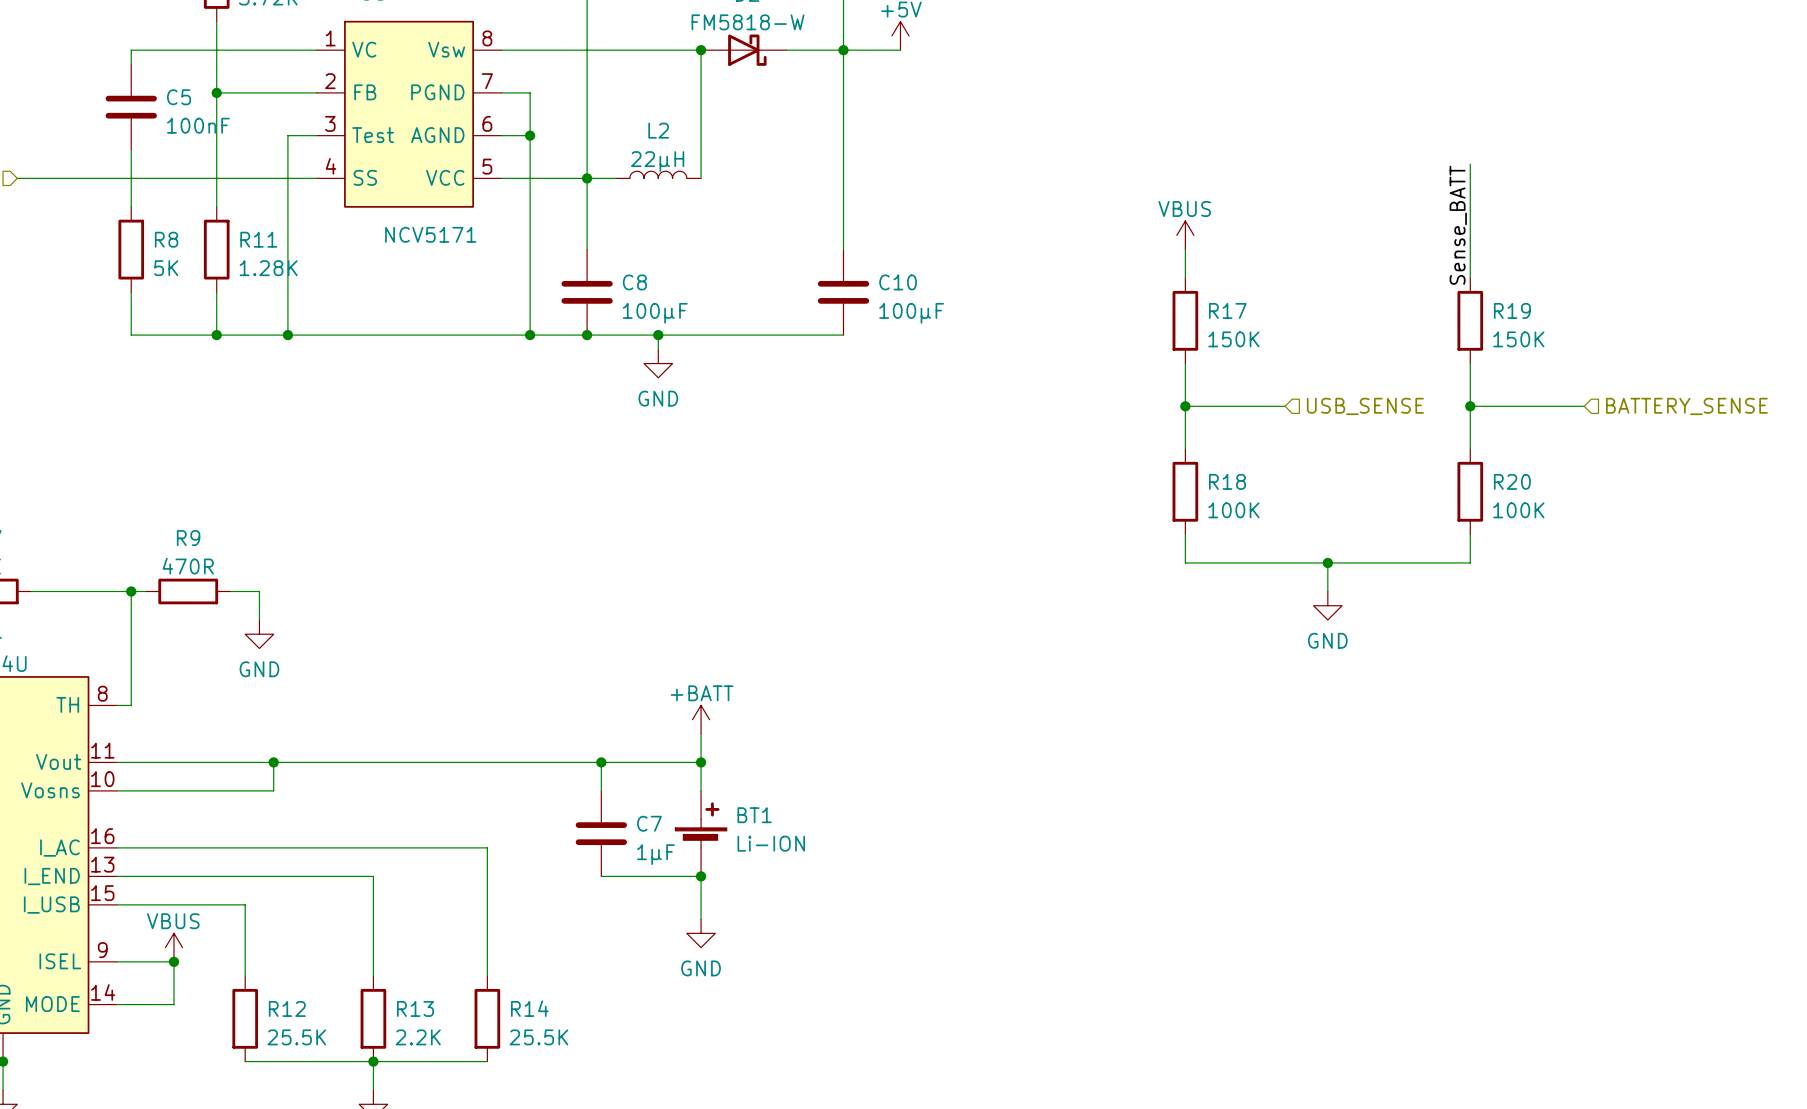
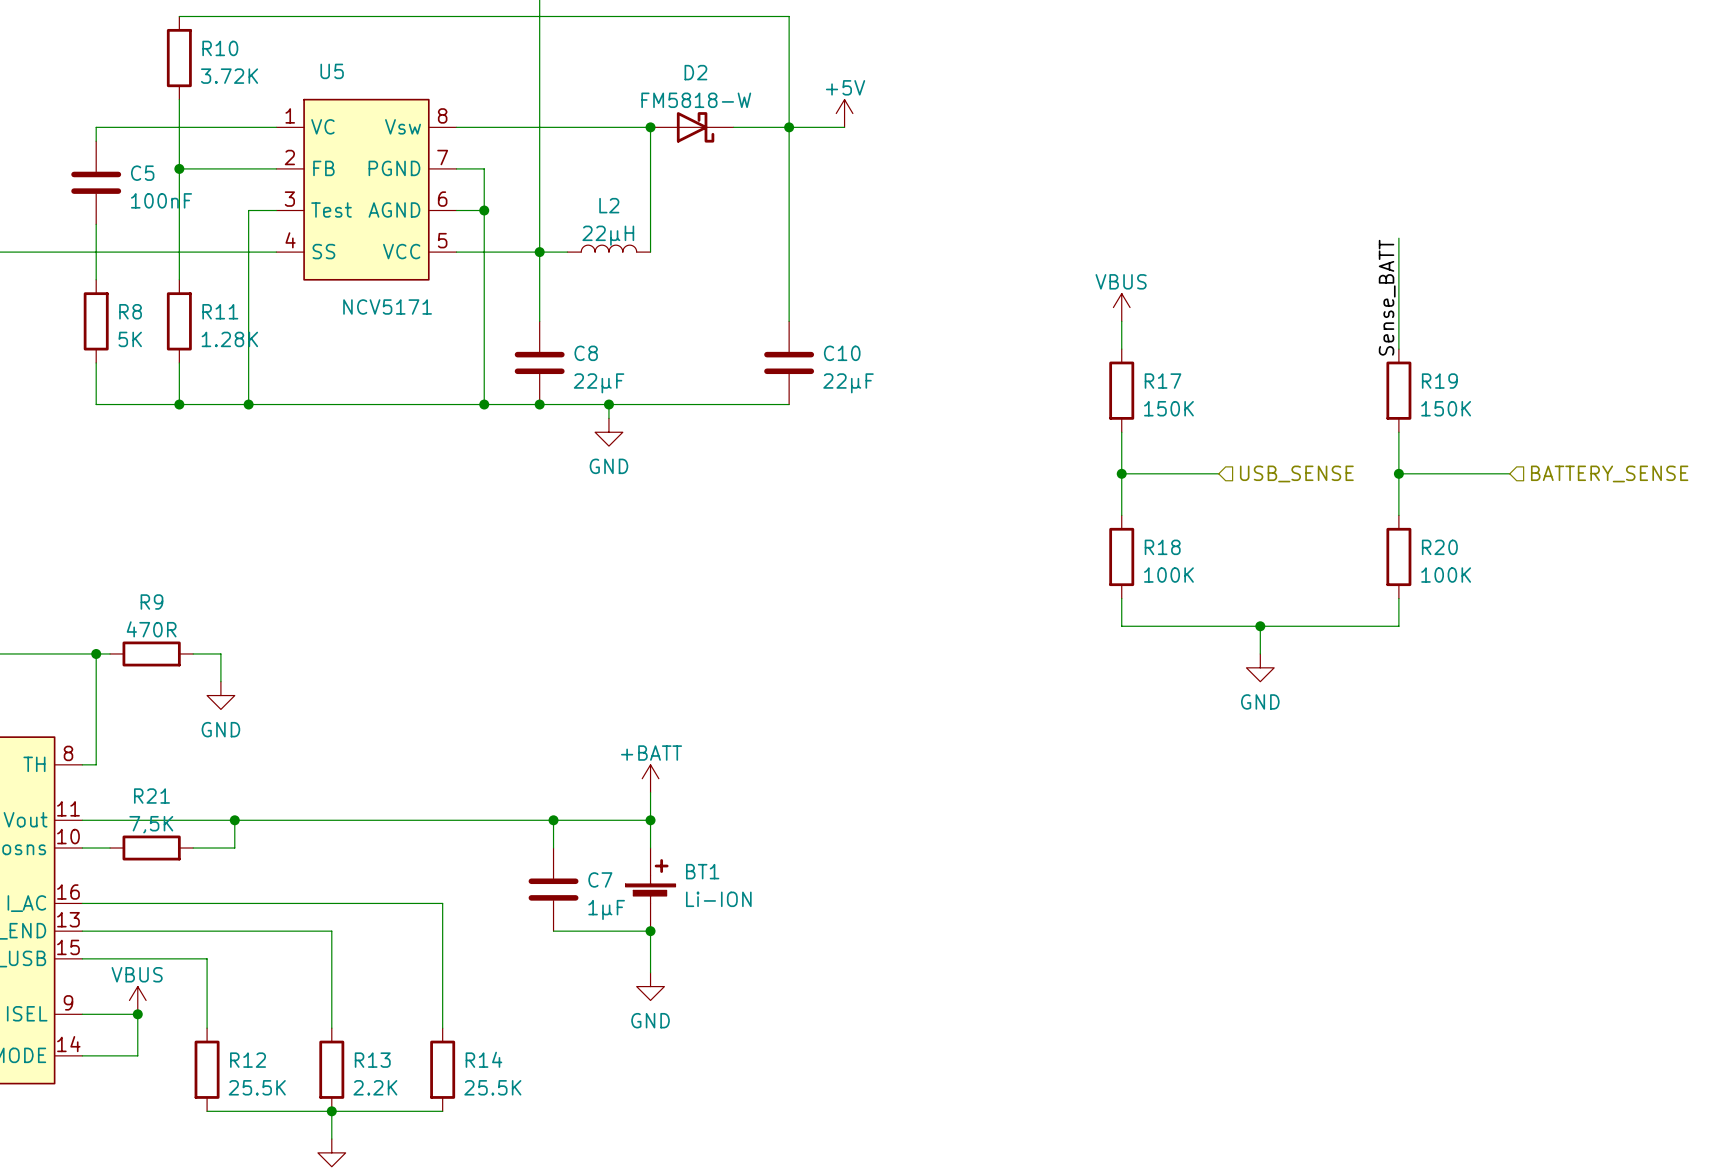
C8 value: 100µF (655, 313) -> 22µF (599, 383)
C10 value: 100µF (911, 313) -> 22µF (848, 383)
wire: (145, 790) (230, 790) -> none
R21: none -> 7,5K (151, 848)

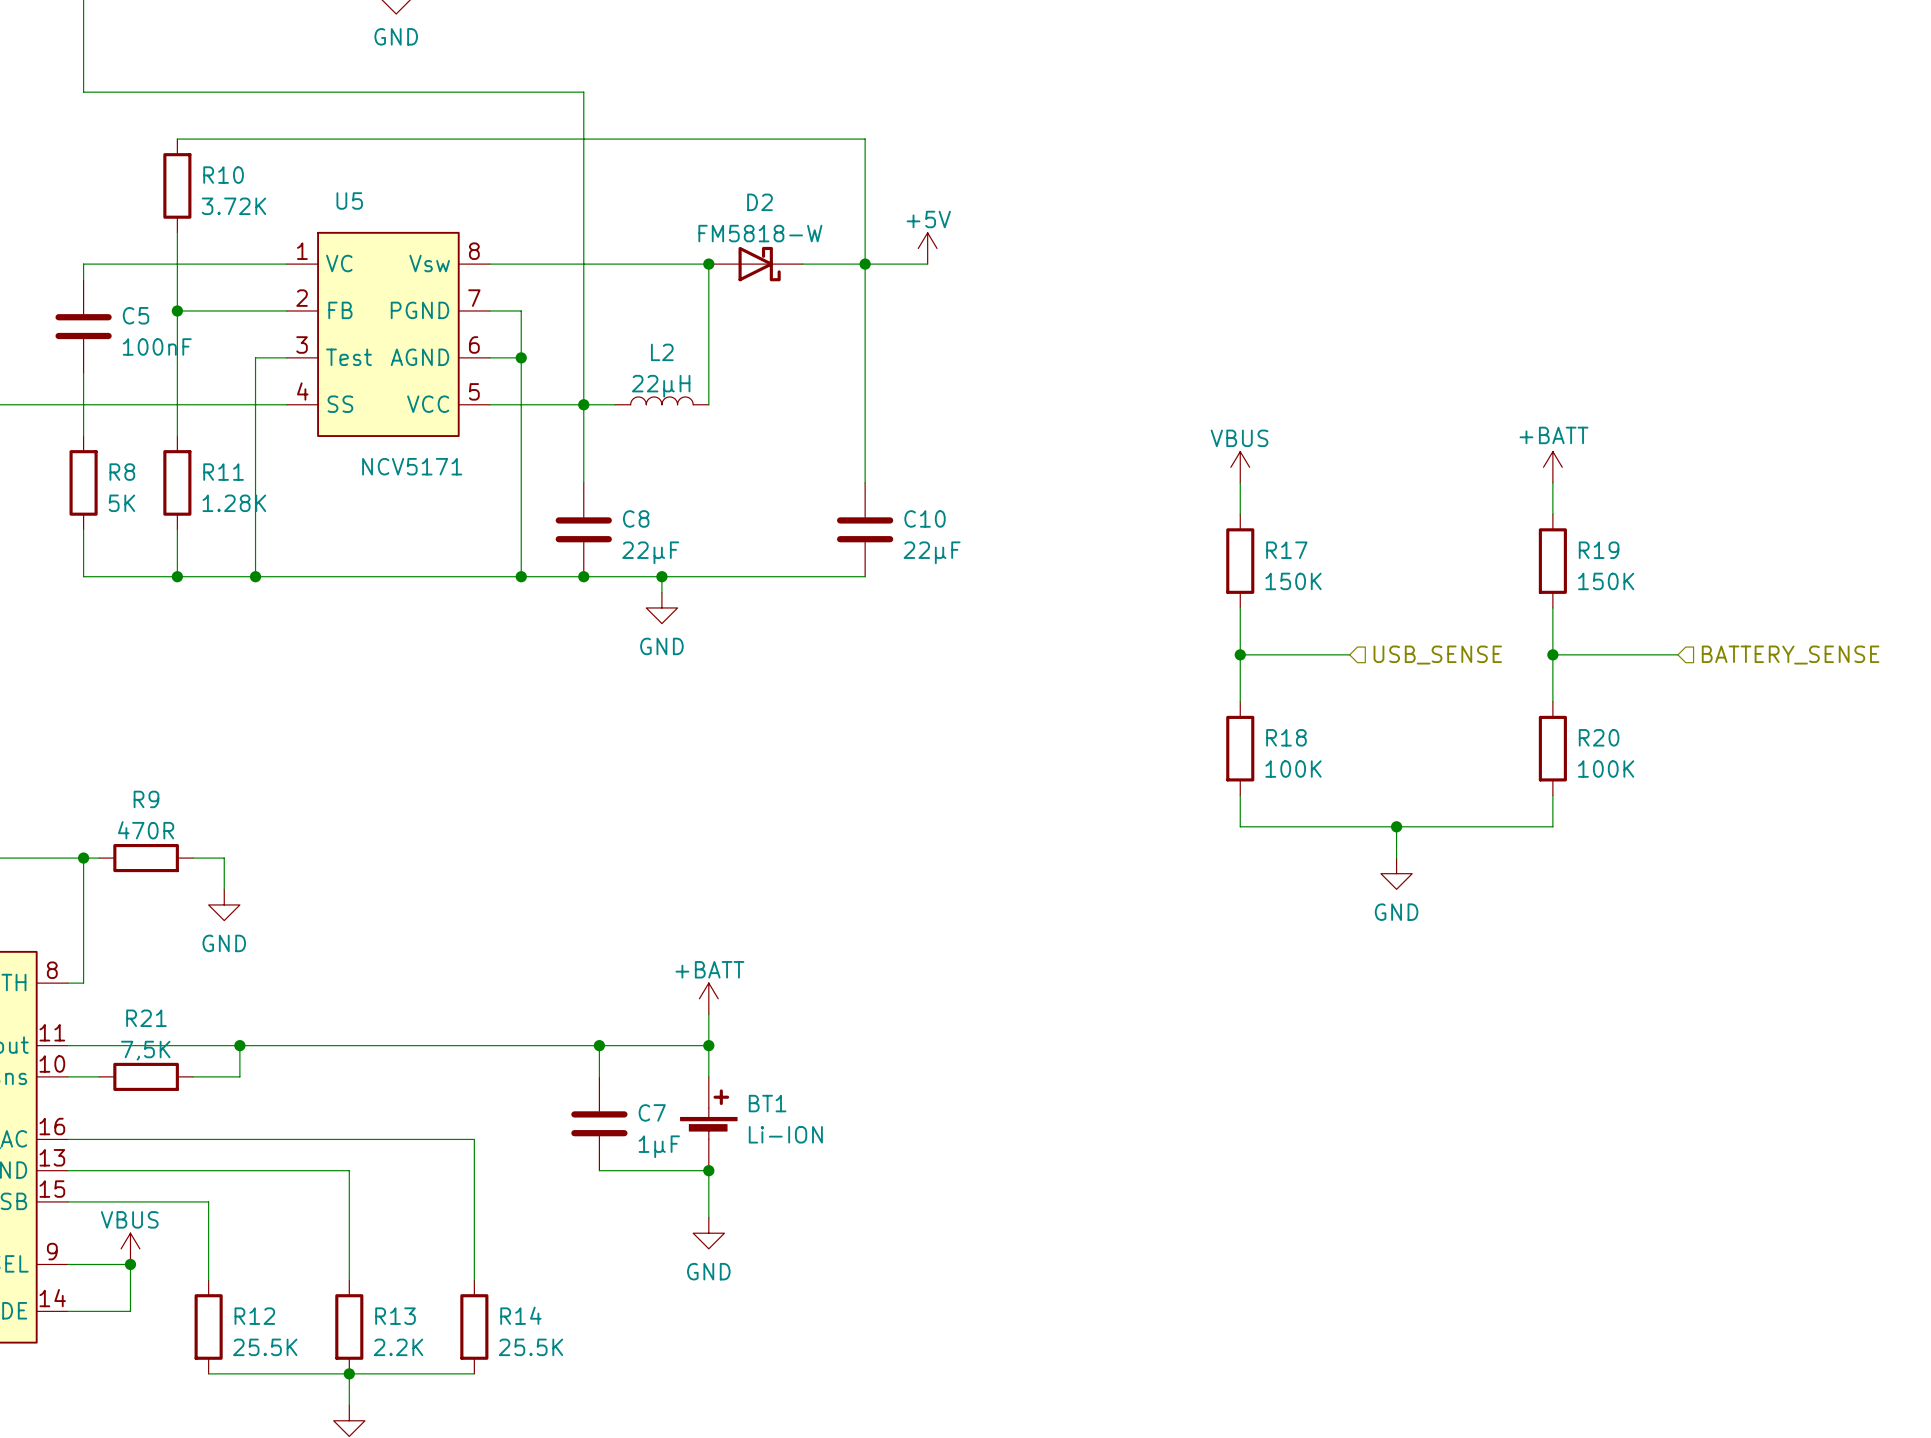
wire: (1398, 238) (1398, 321) -> none
label: Sense_BATT (1387, 297) -> none
power symbol: none -> +BATT (1552, 467)

